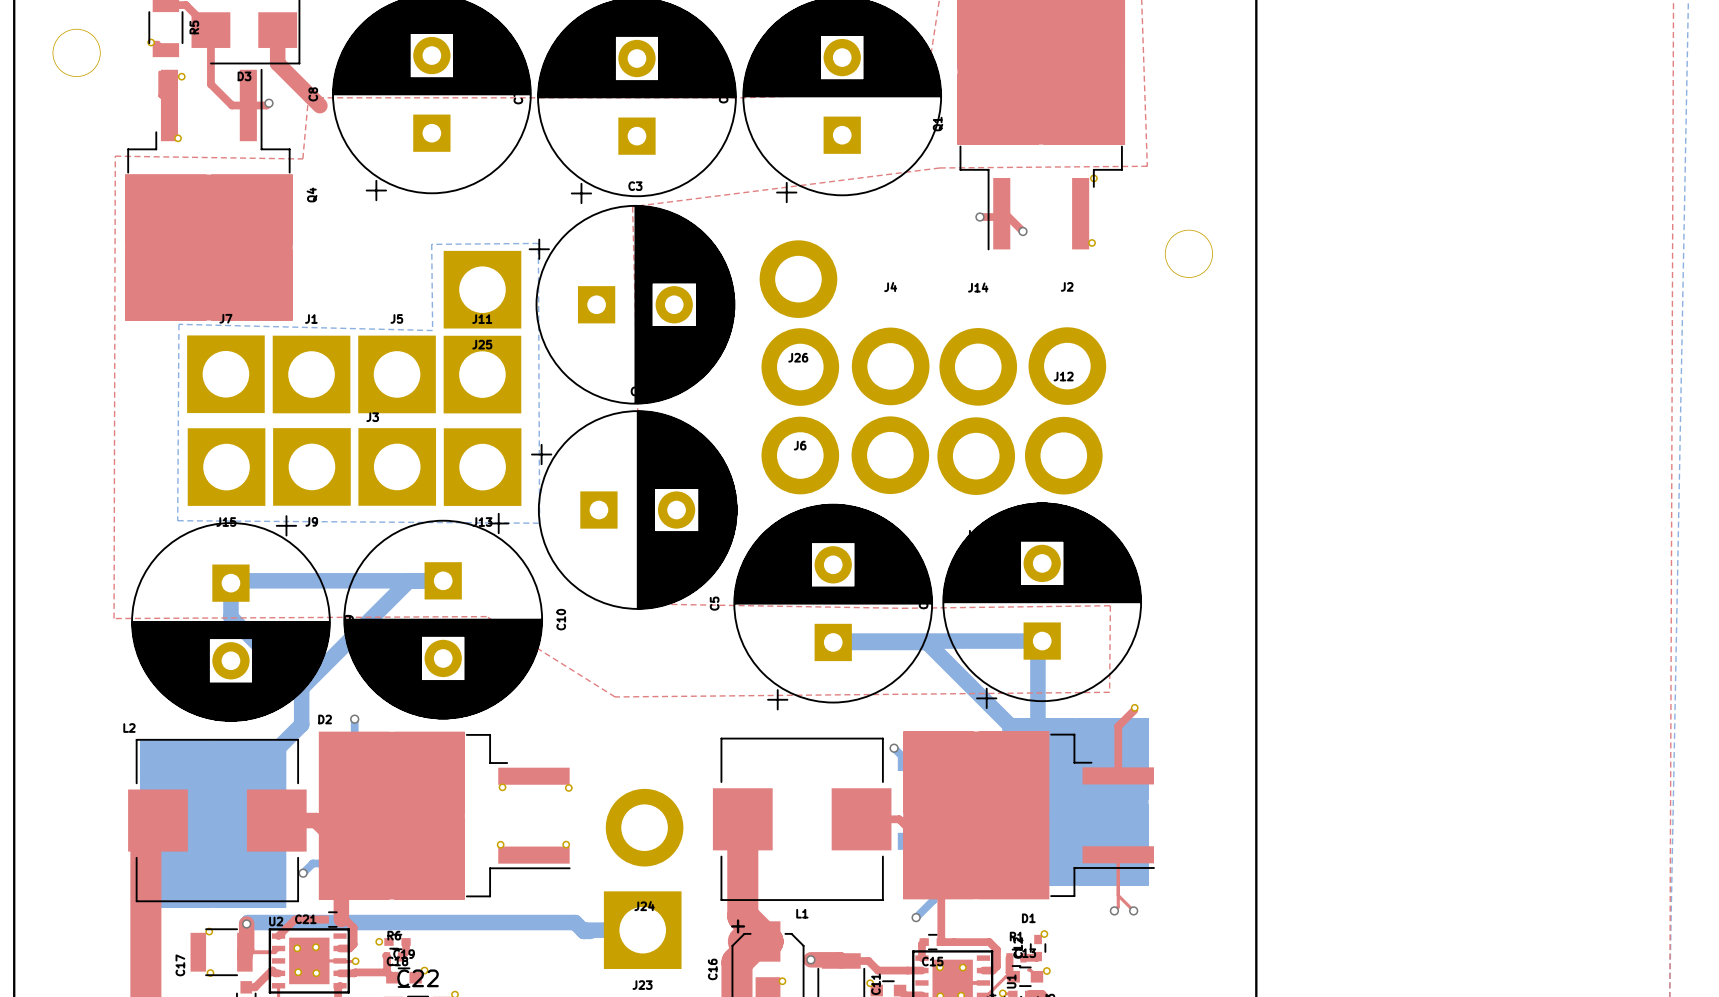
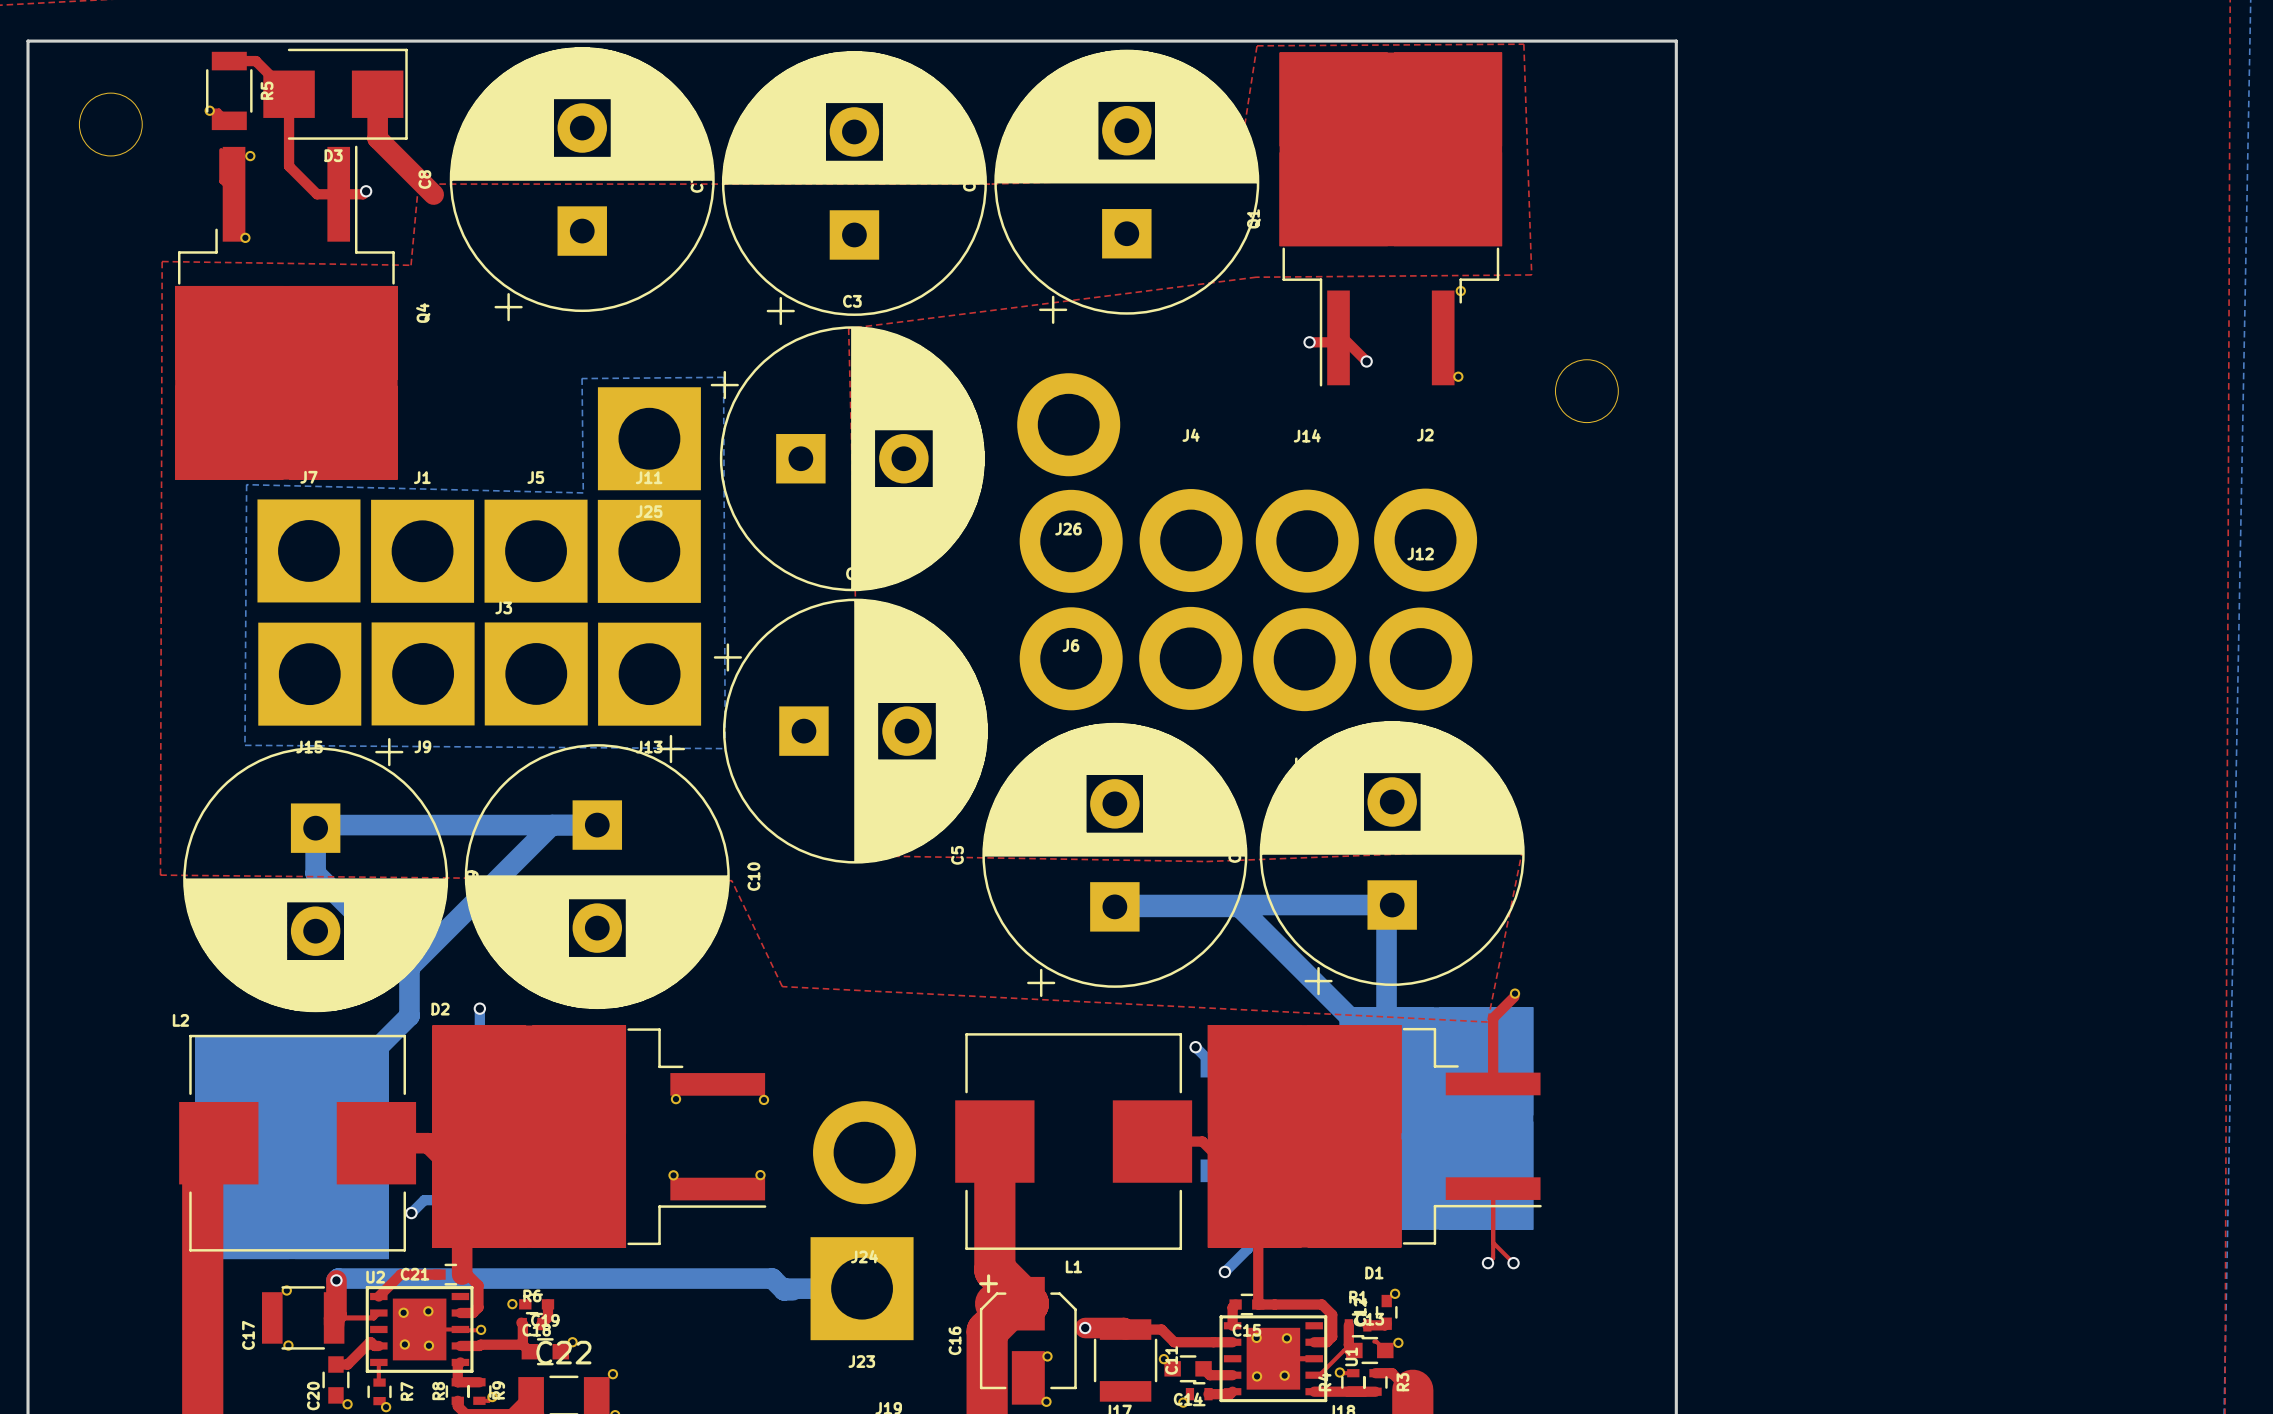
top zone outline: (902, 608) (1110, 605) (1109, 692) (615, 696) (486, 616) (114, 618) -> (1206, 861) (1522, 849) (1487, 1022) (782, 986) (731, 880) (160, 875)

